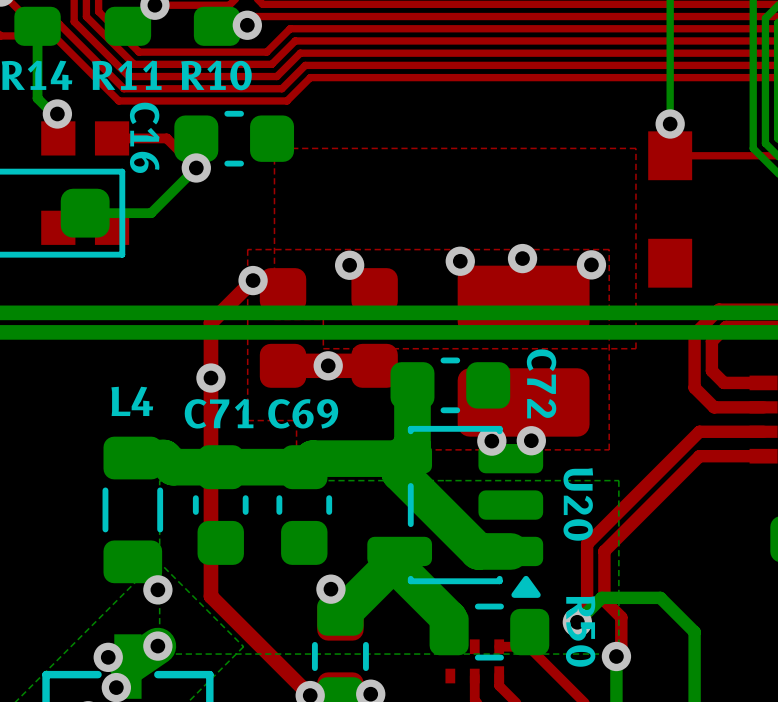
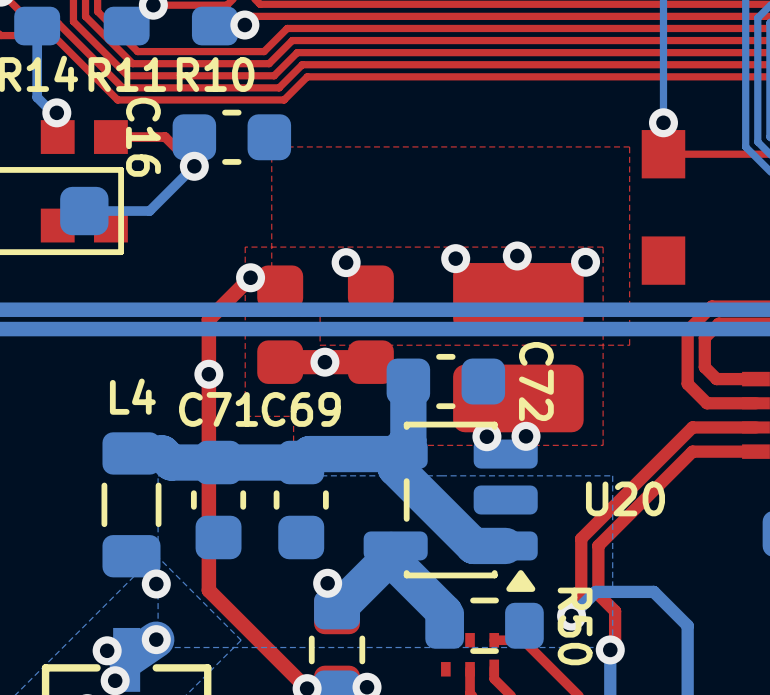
U20 name rotation: 0° (578, 504) -> 90° counterclockwise (625, 498)

